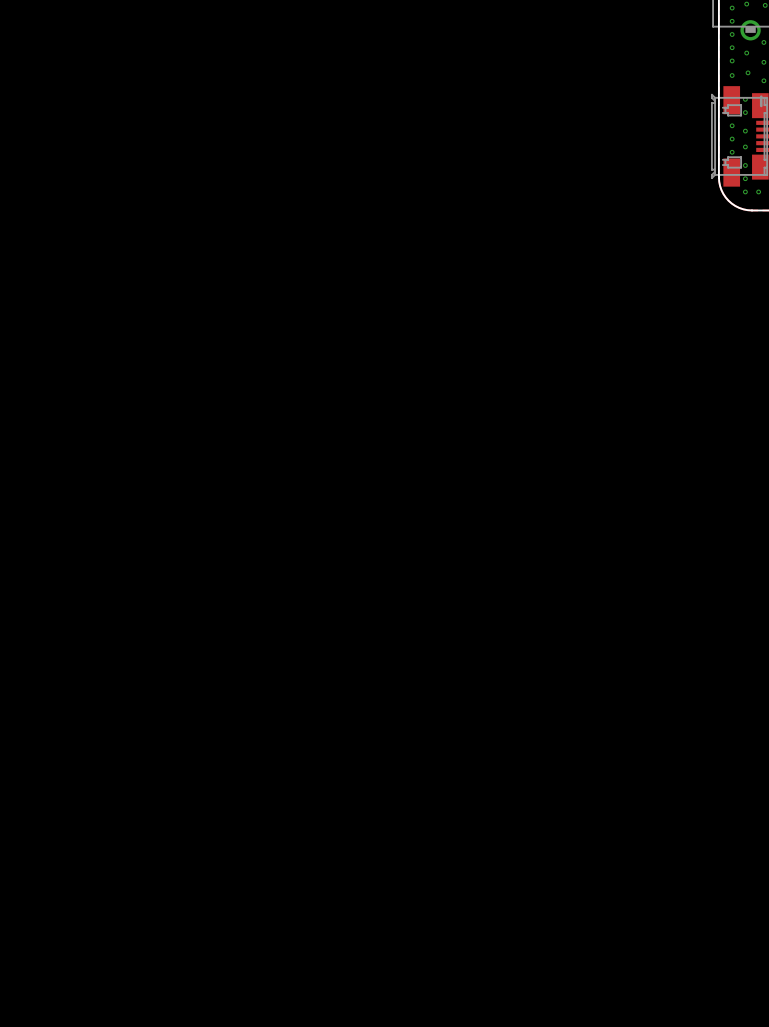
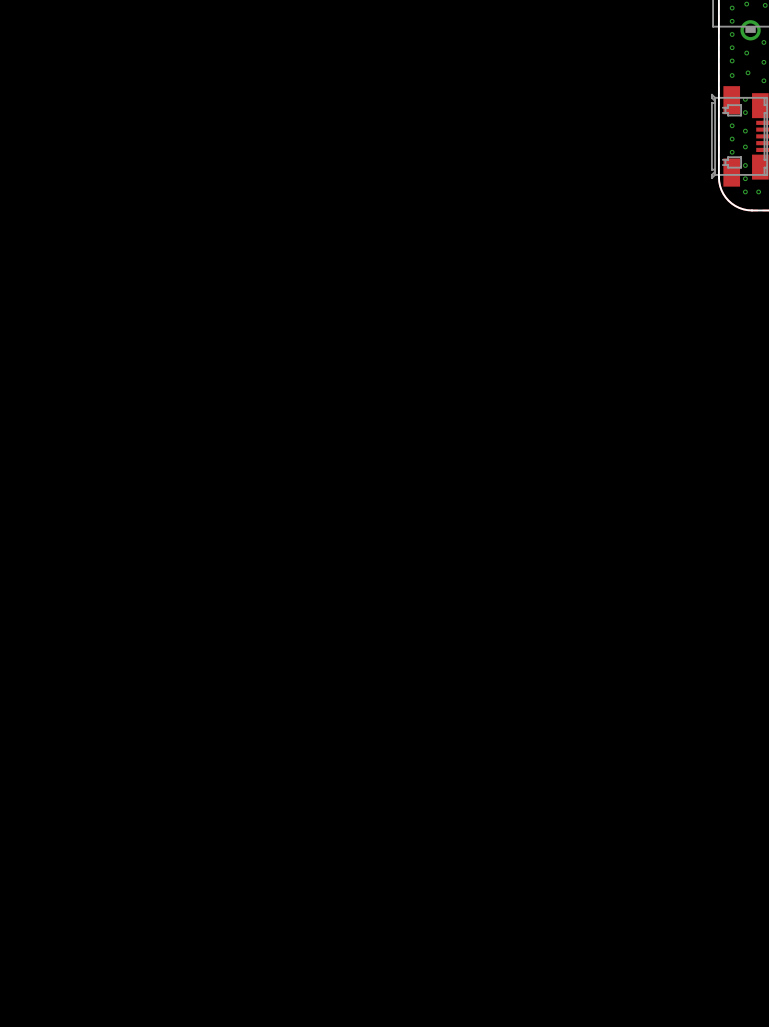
line: (761, 96) (761, 105) -> none

